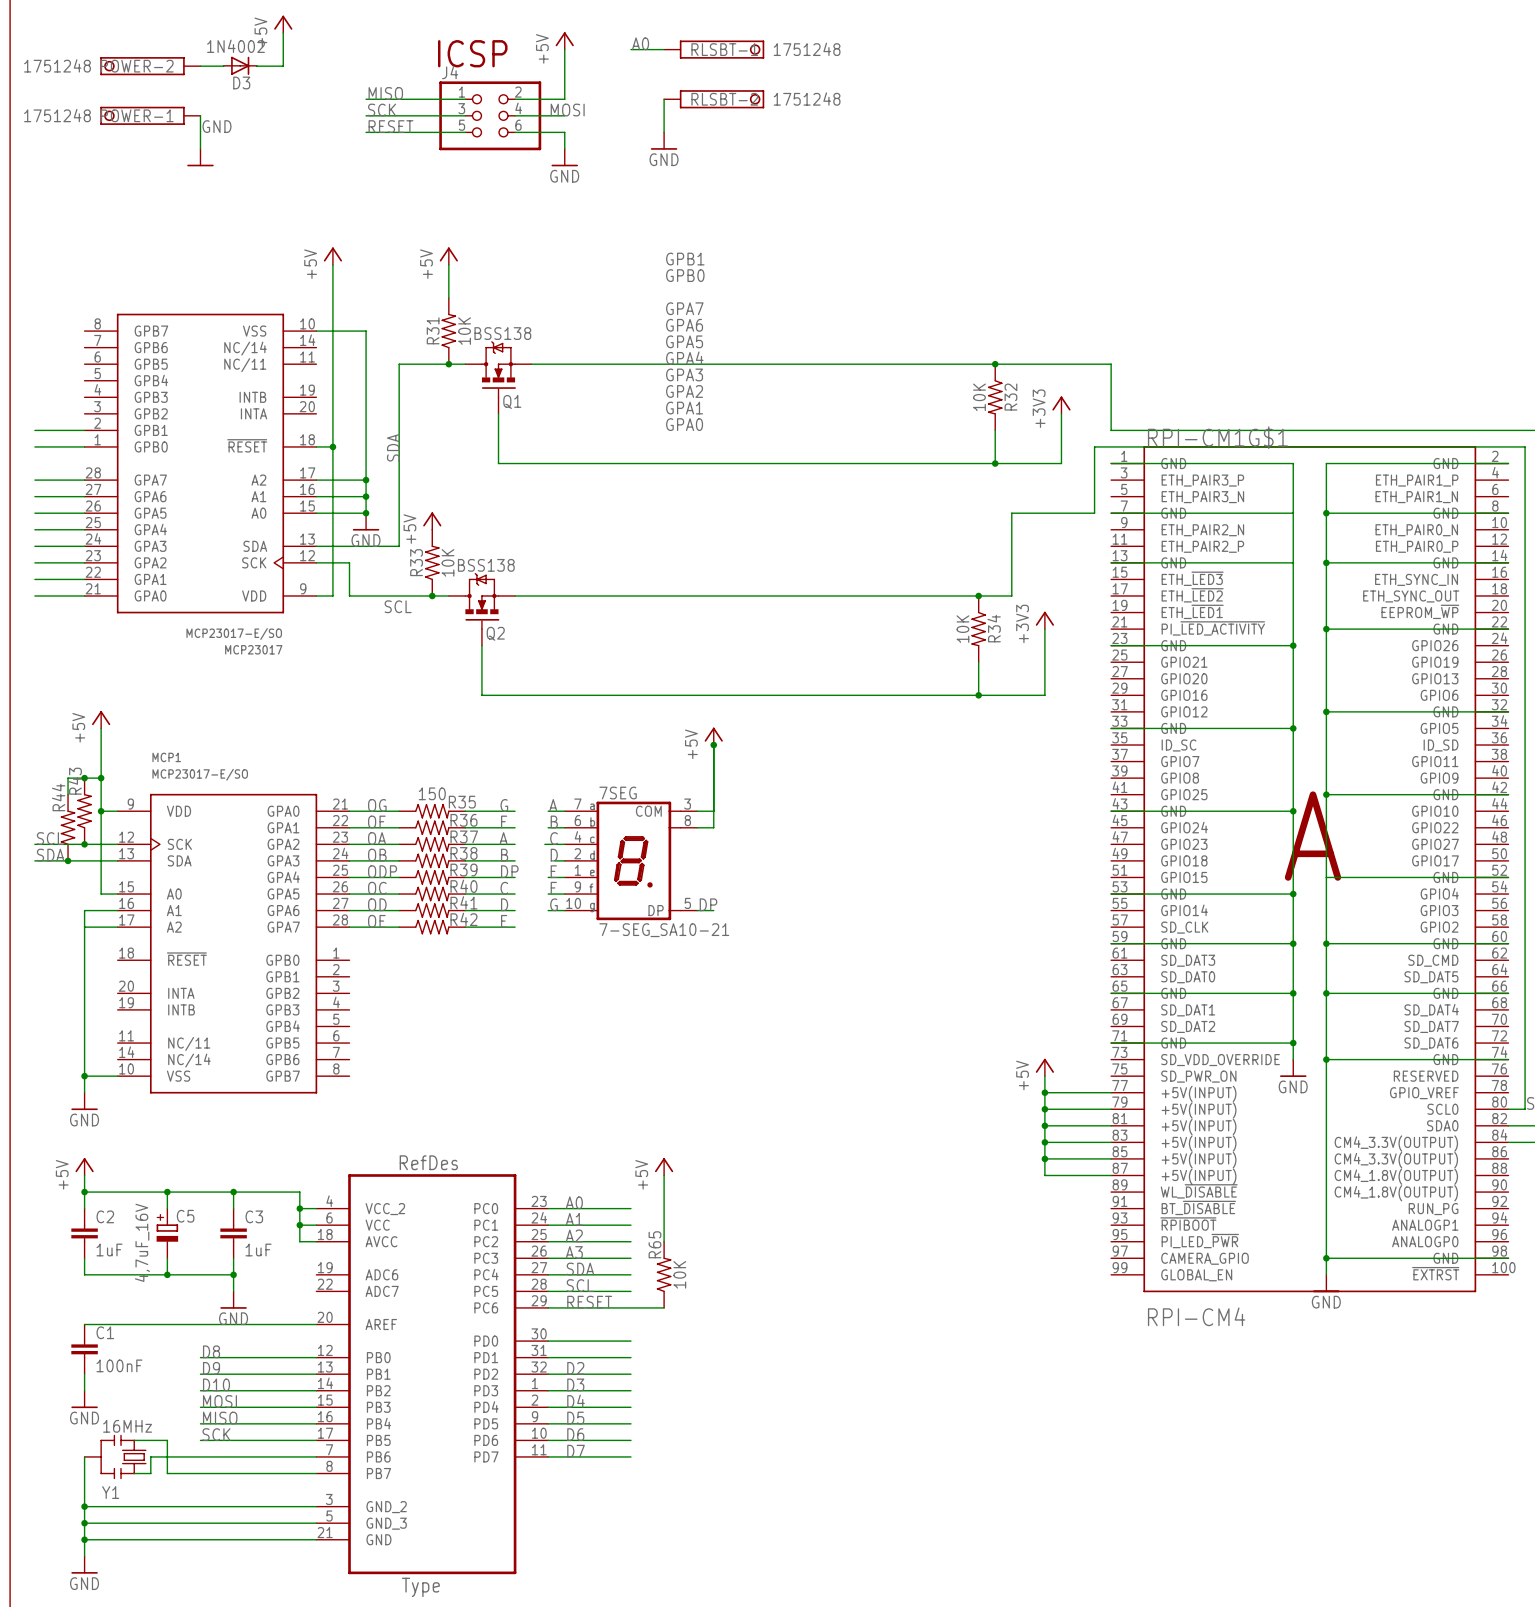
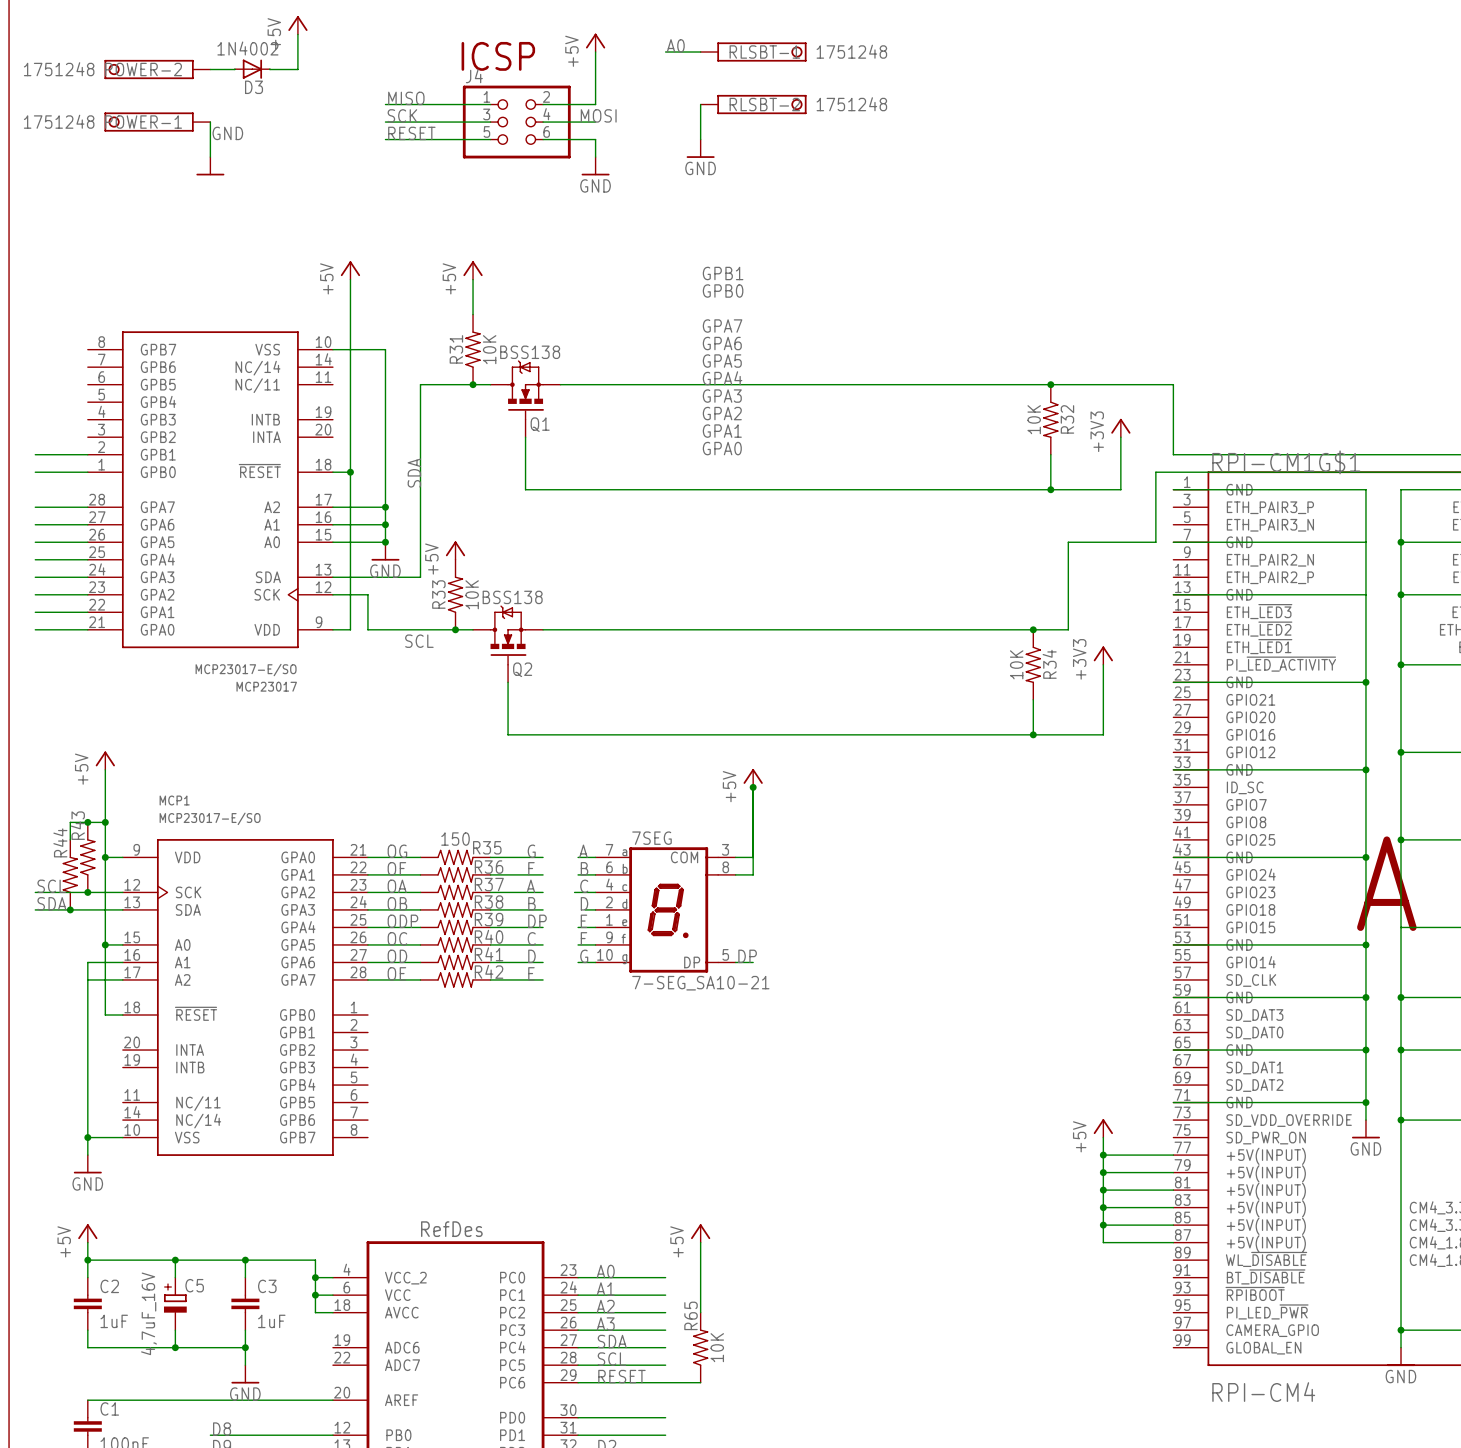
wire: none -> (105, 944) (105, 1015) (122, 1015)
junction: none -> (105, 944)

